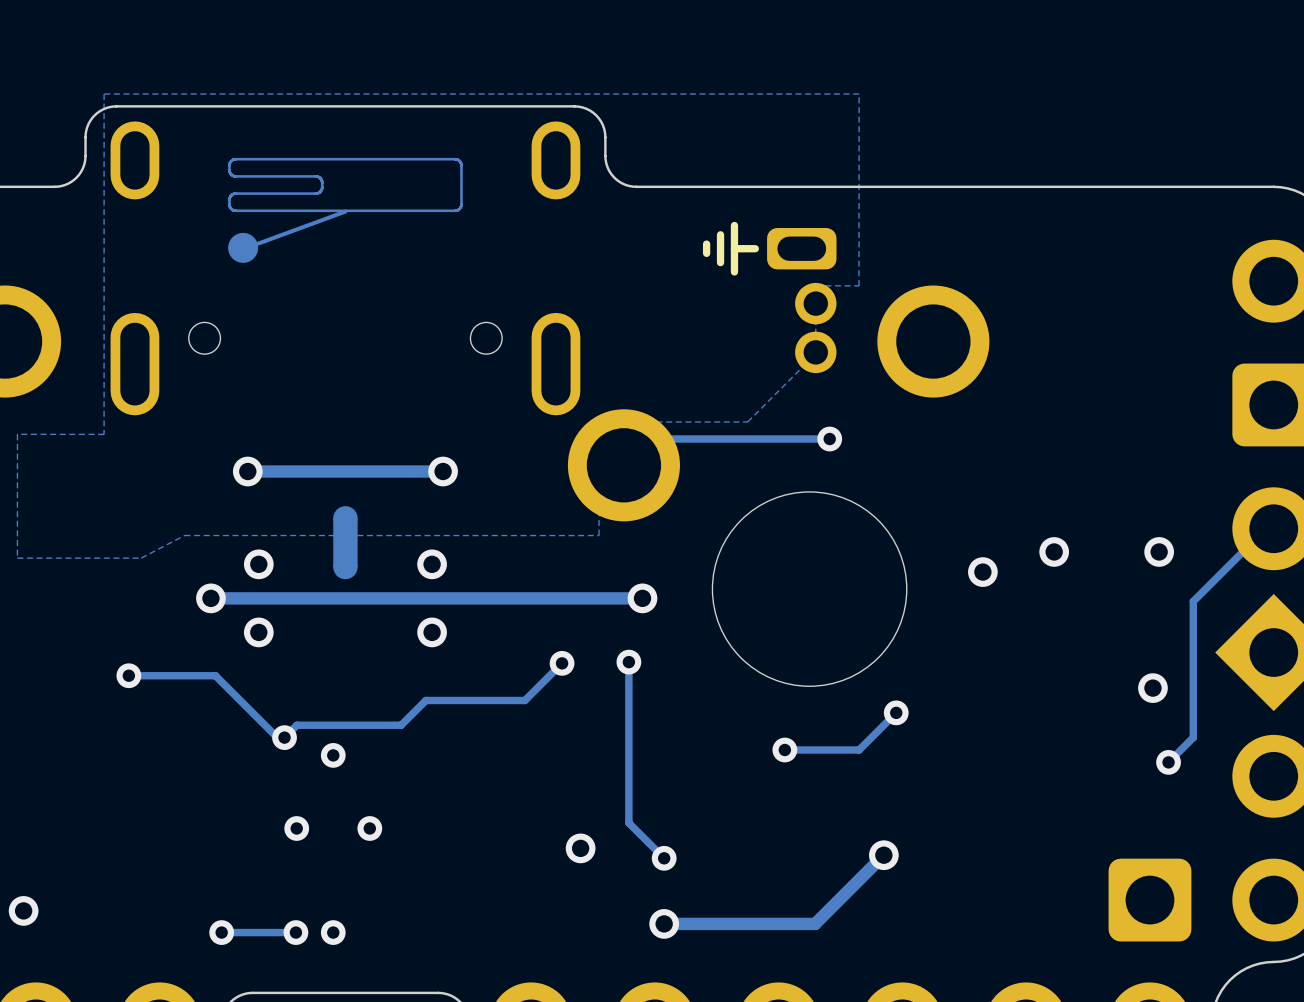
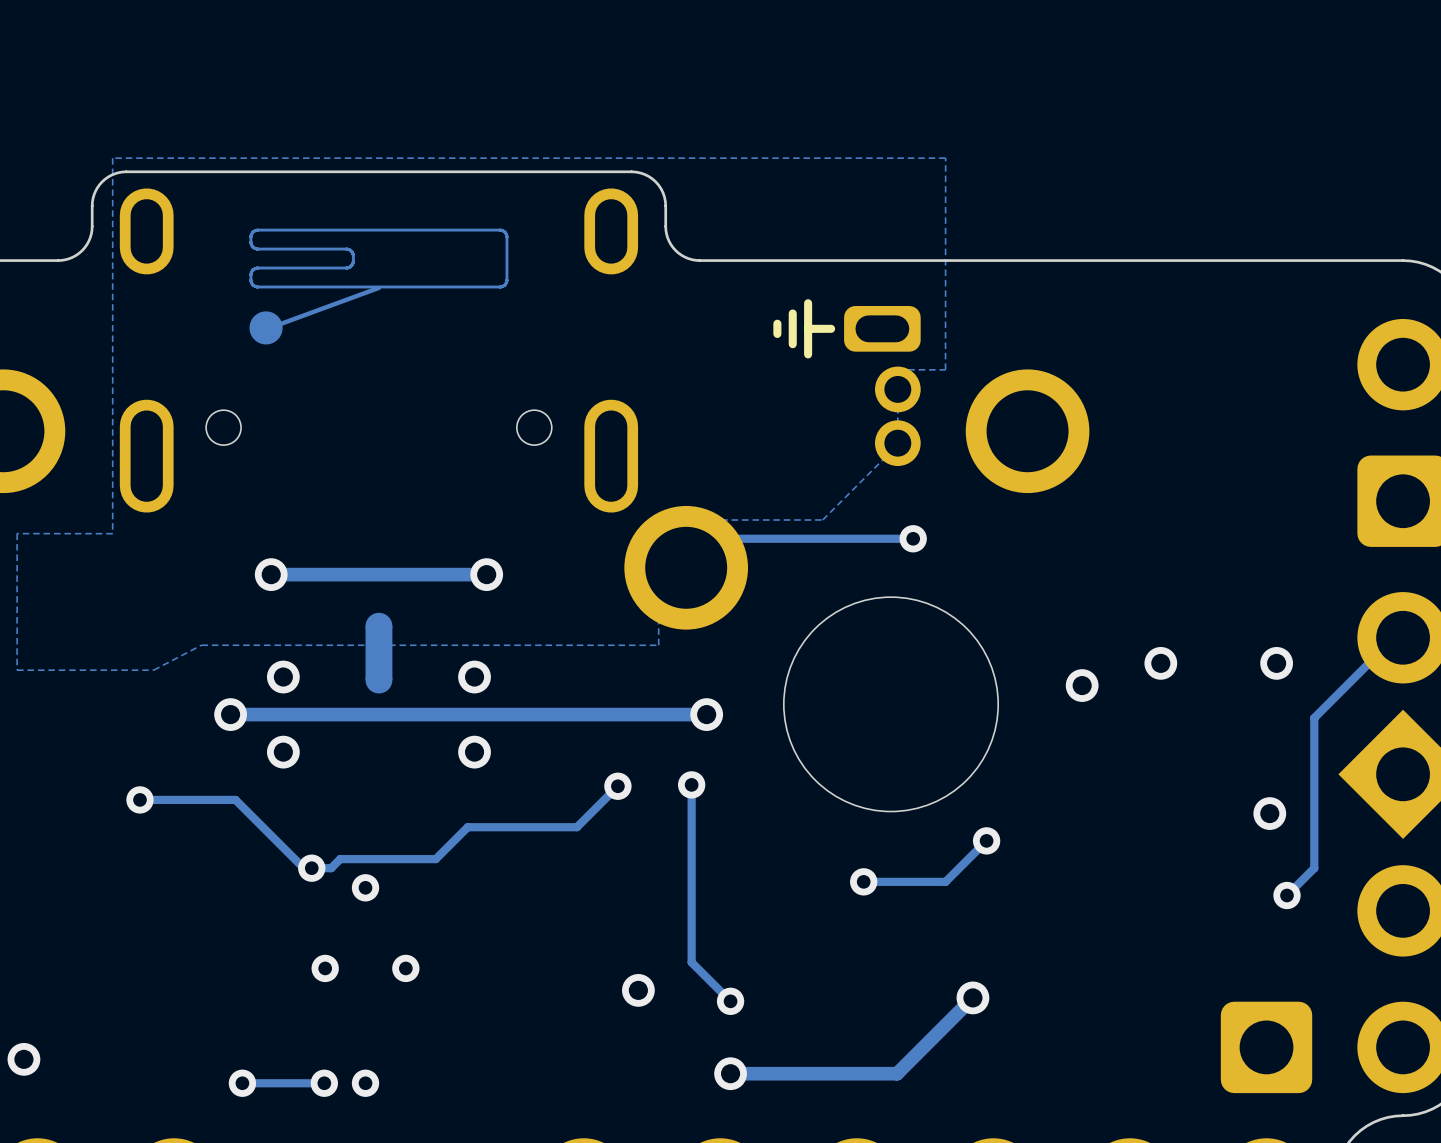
track: (401, 725) (296, 725) (284, 737) -> (440, 854) (435, 859) (340, 859) (331, 868) (311, 868)

